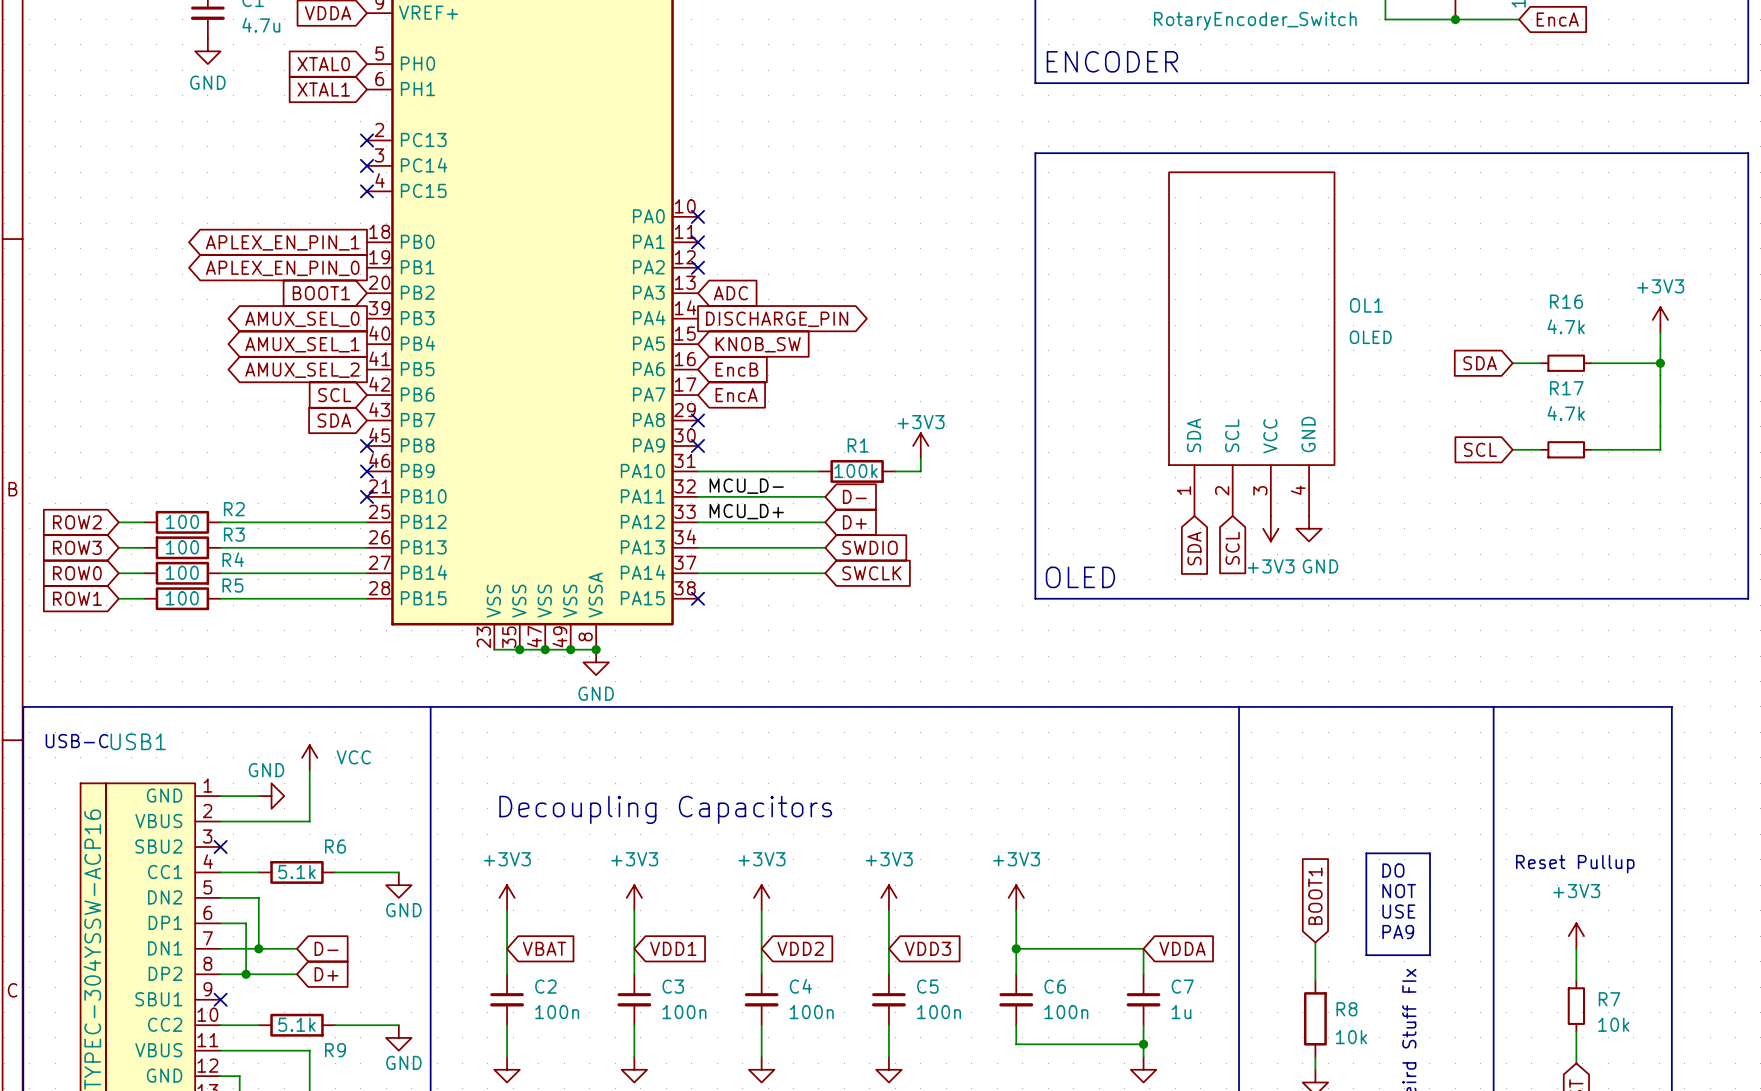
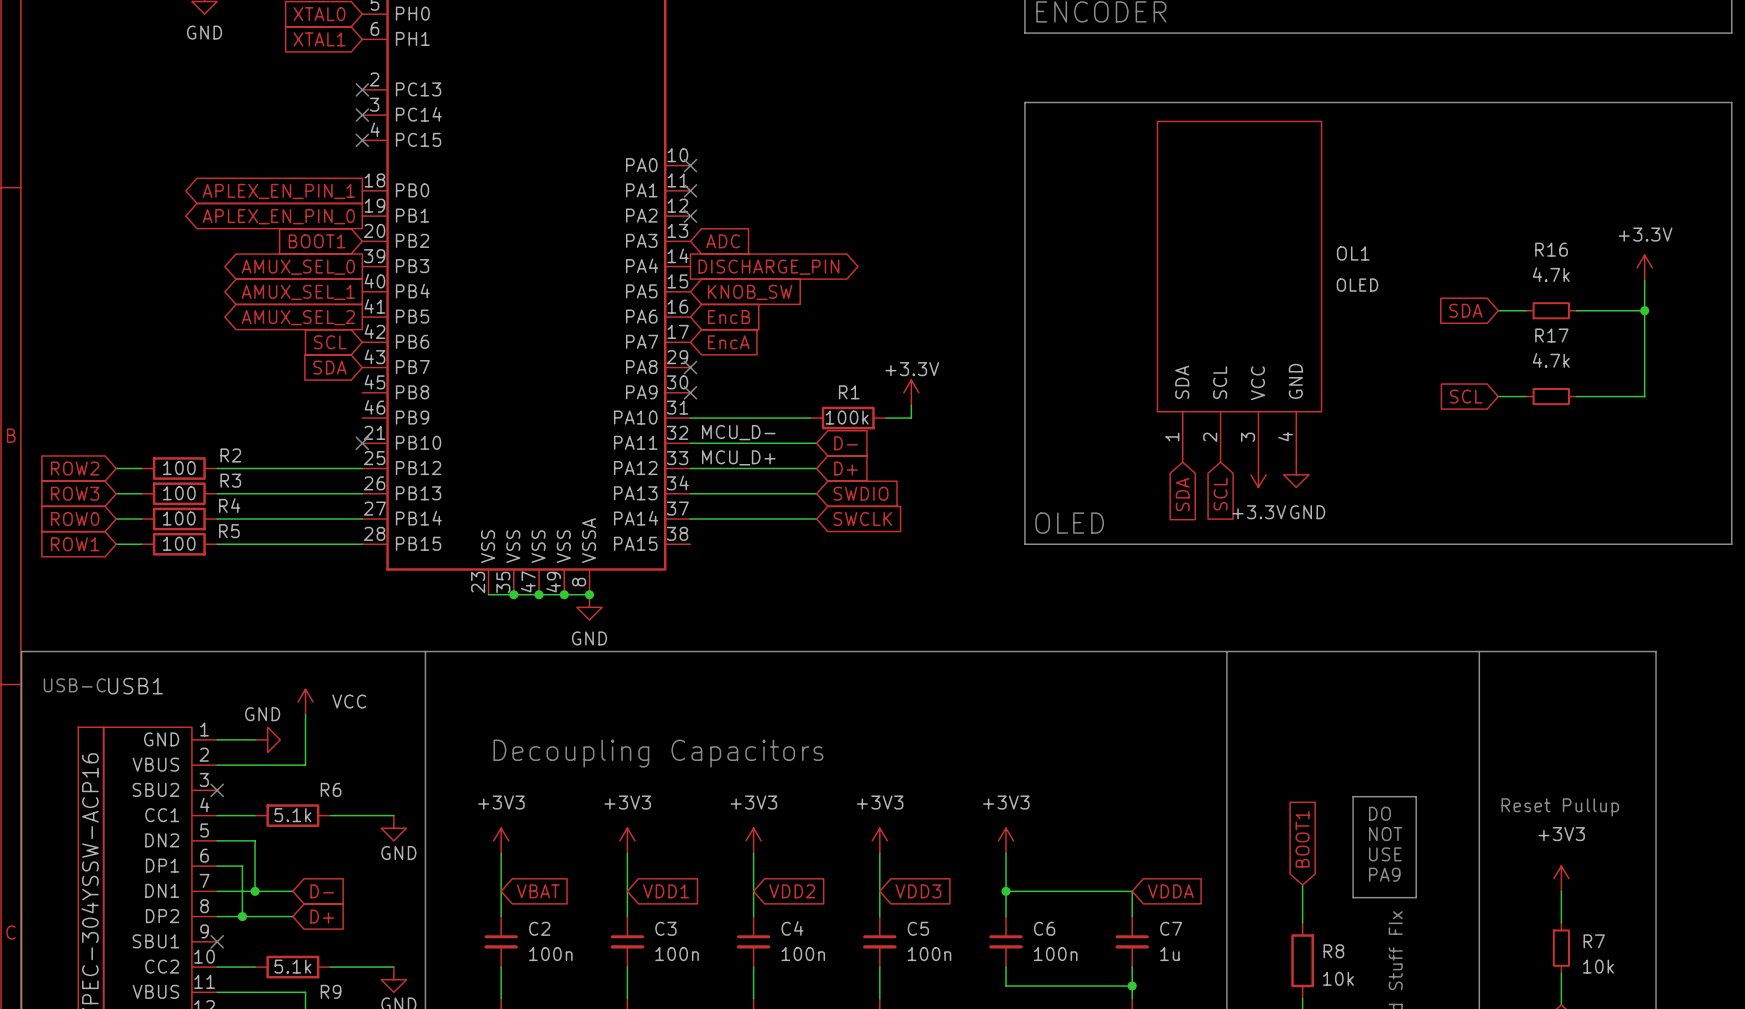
power symbol: +3V3 (1660, 319) -> +3.3V (1644, 267)
no-connect mark: (367, 445) -> none
power symbol: +3V3 (920, 445) -> +3.3V (911, 392)
no-connect mark: (367, 471) -> none
power symbol: +3V3 (1270, 528) -> +3.3V (1258, 474)
no-connect mark: (697, 598) -> none

